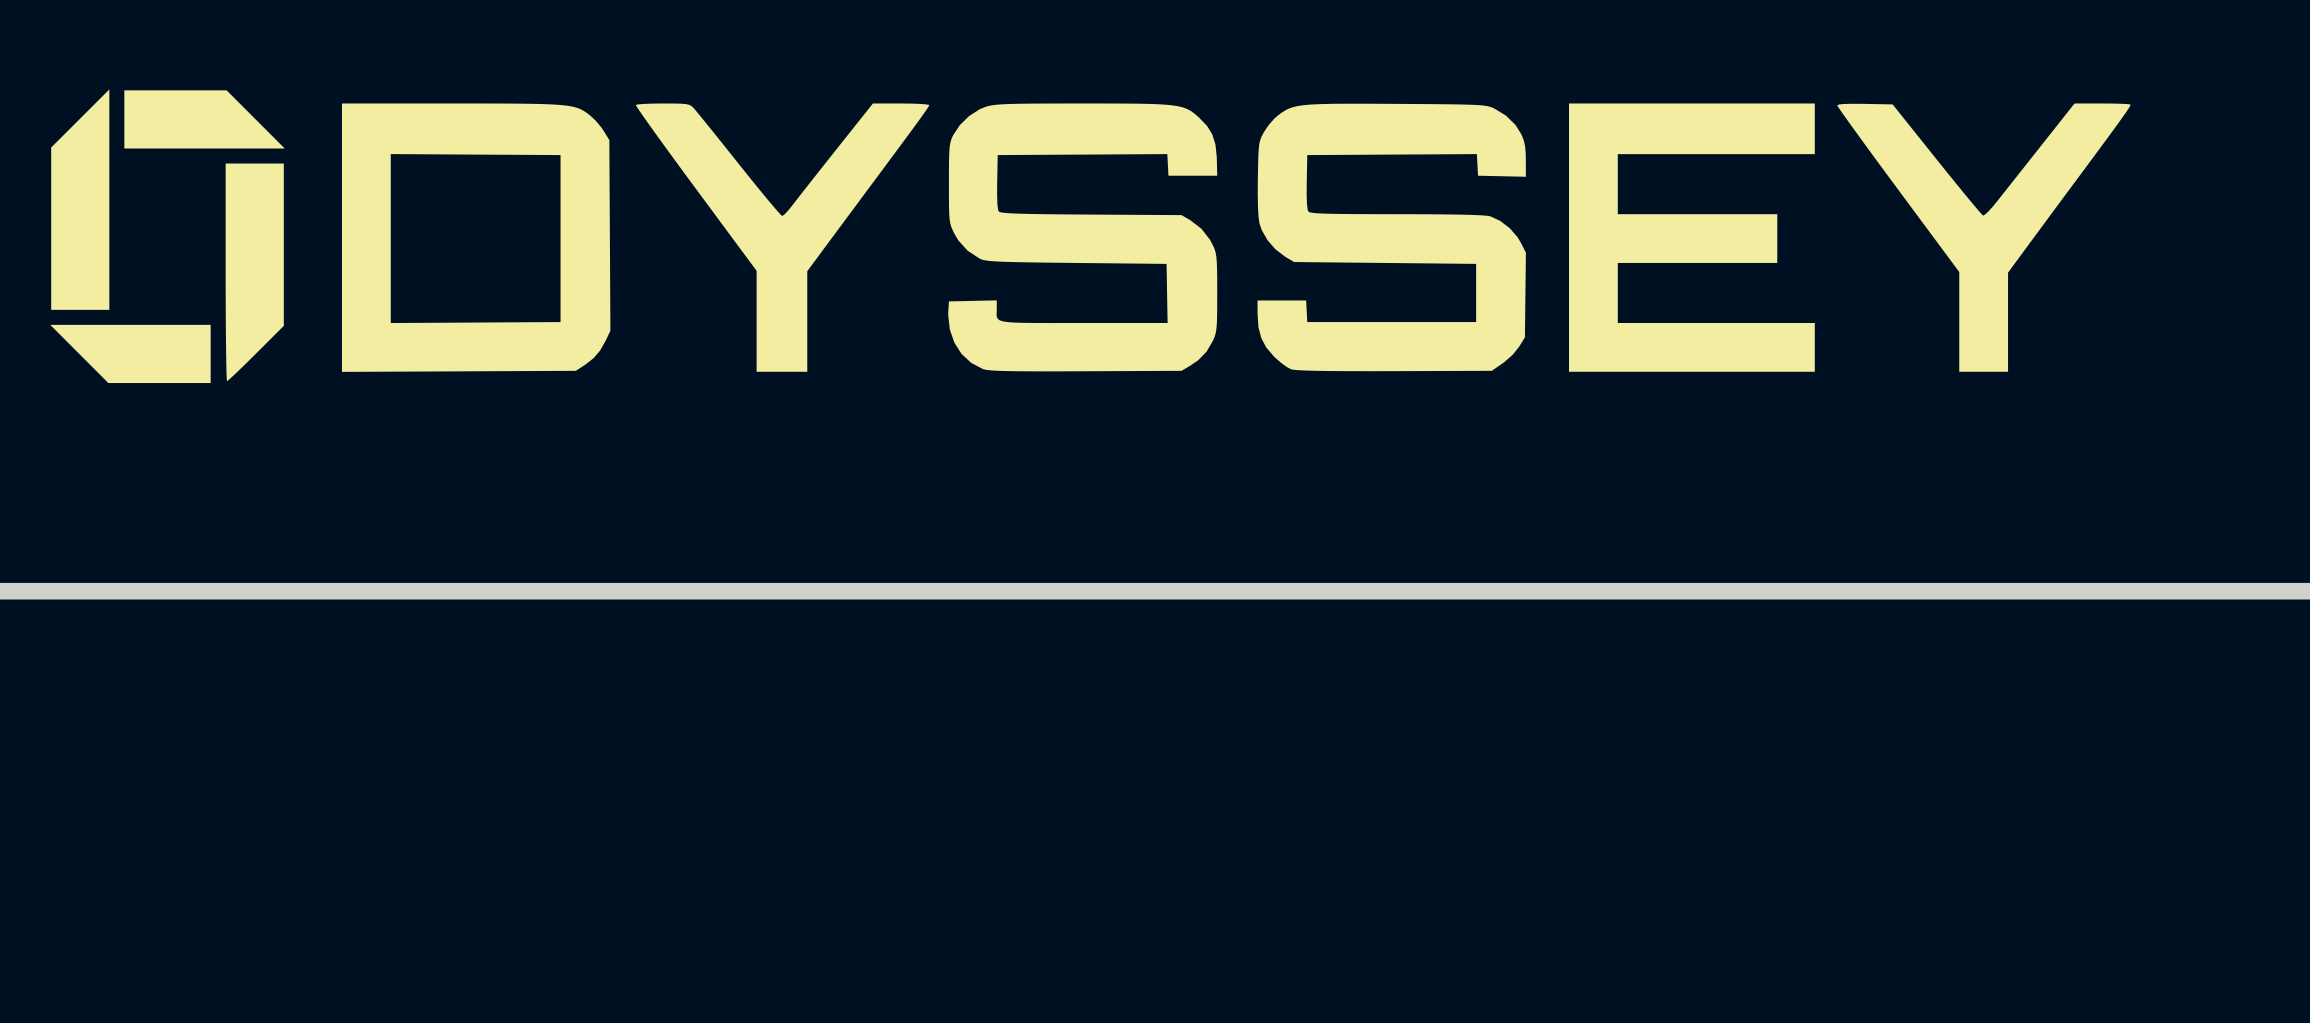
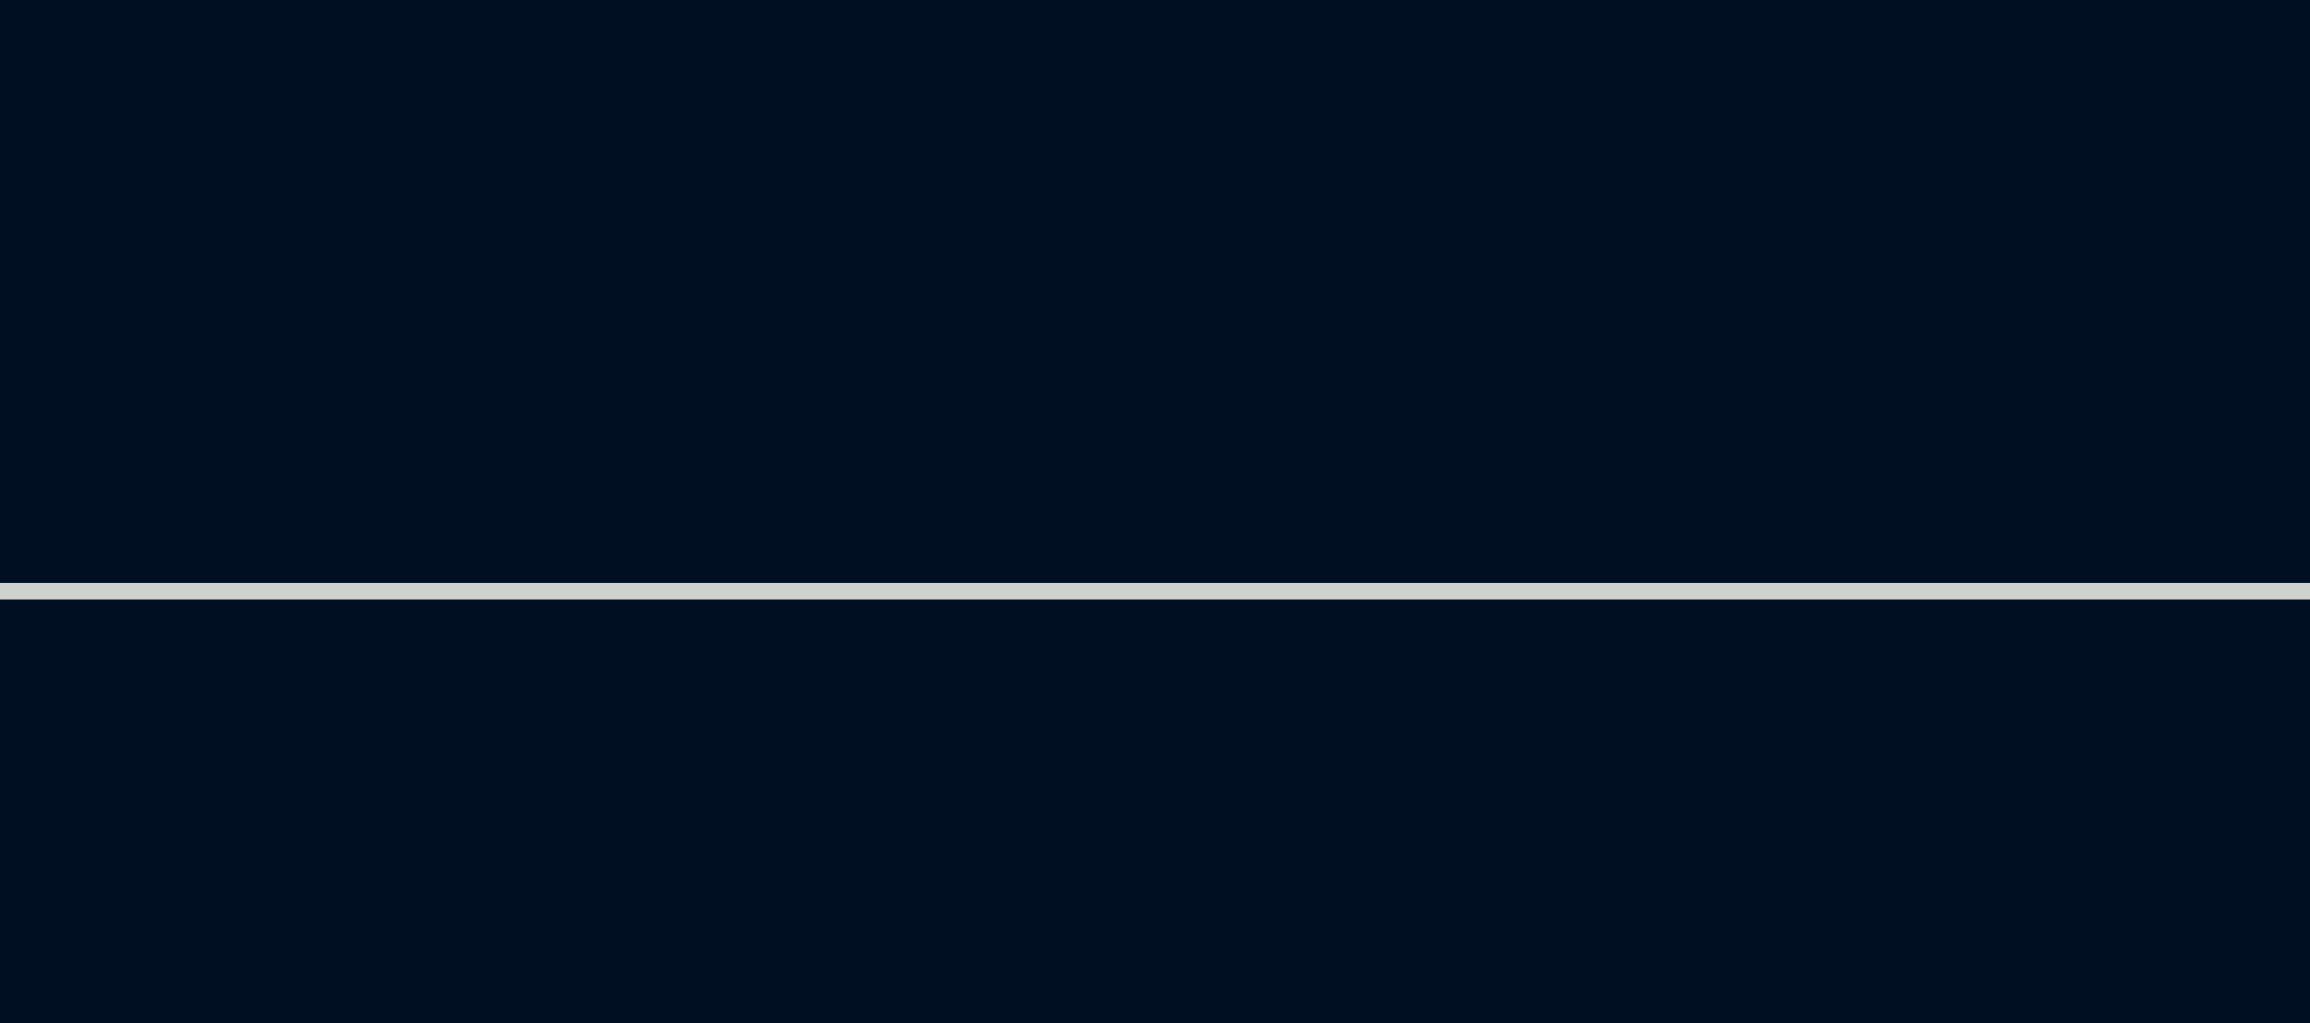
drawing: [50, 89, 2131, 384] -> none

